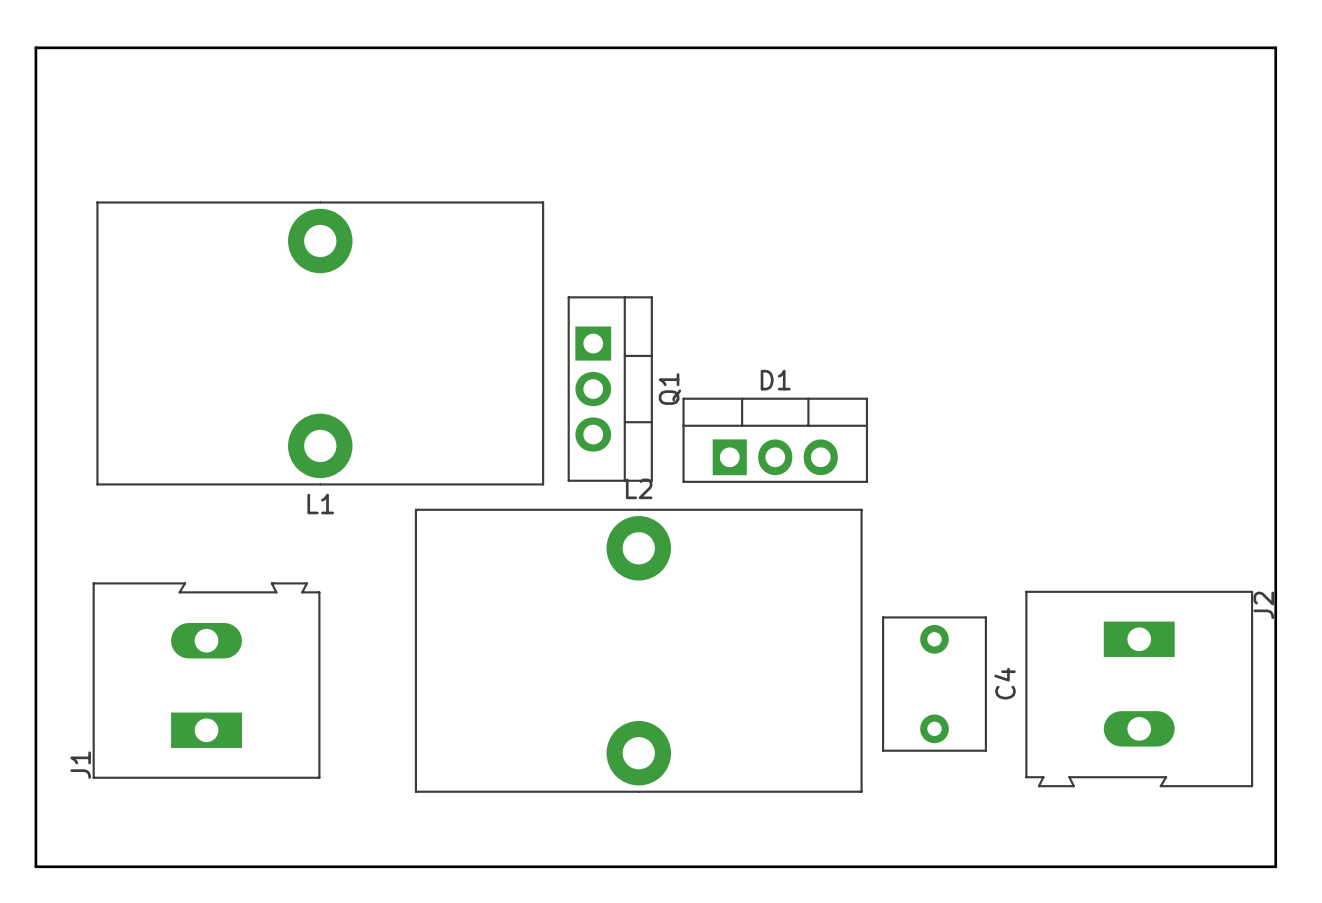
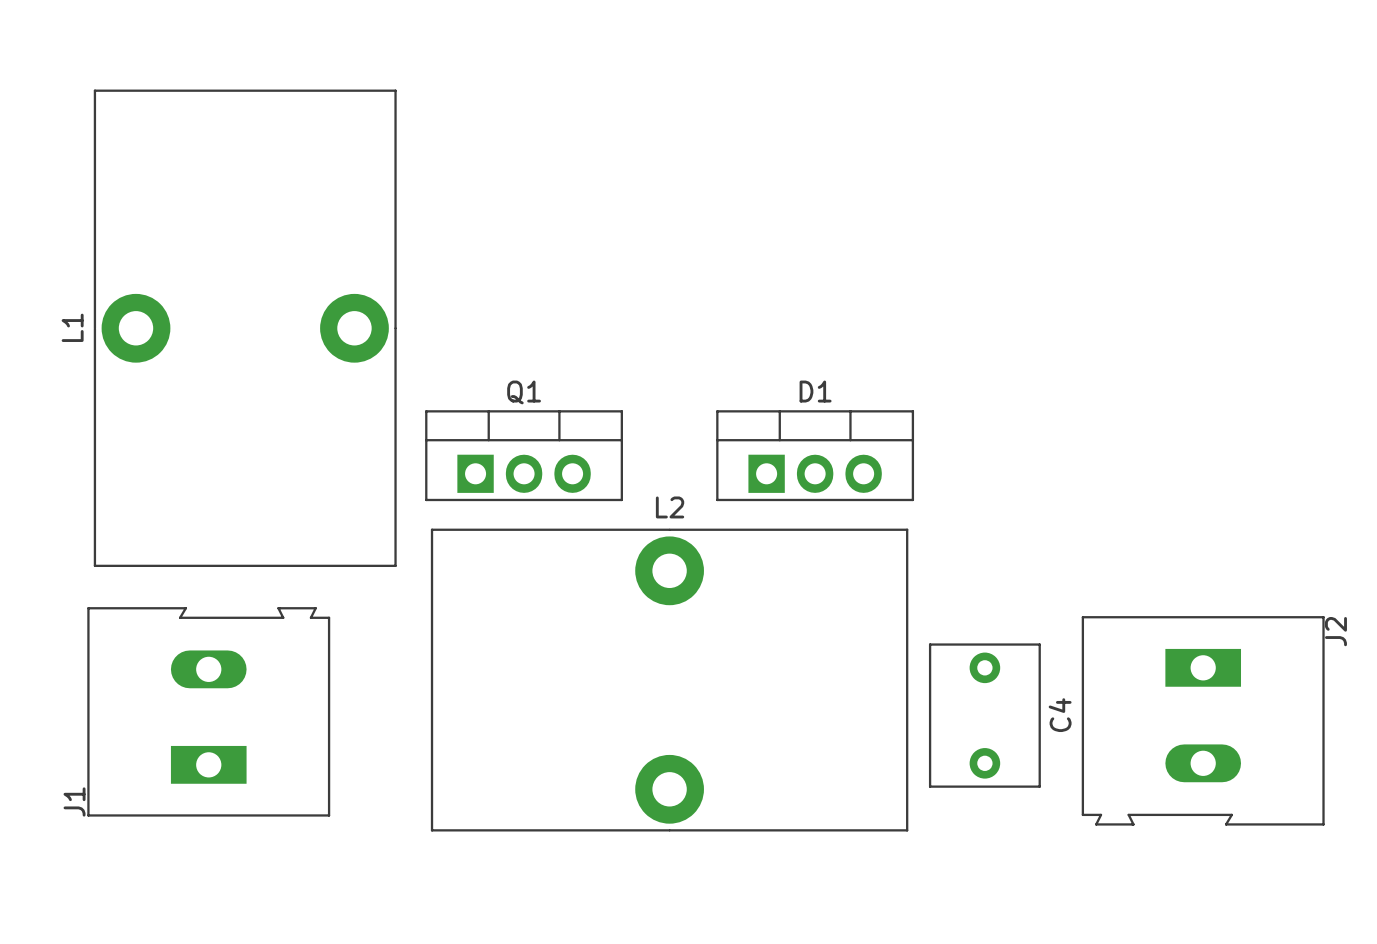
board edge: (35, 47) (1275, 47) (1275, 866) (35, 866) (35, 47) -> none
L1 rotation: 0° (320, 343) -> 90° clockwise (245, 328)
Q1 rotation: 0° (610, 389) -> 90° counterclockwise (524, 455)
Q1 position: (610, 389) -> (524, 455)

